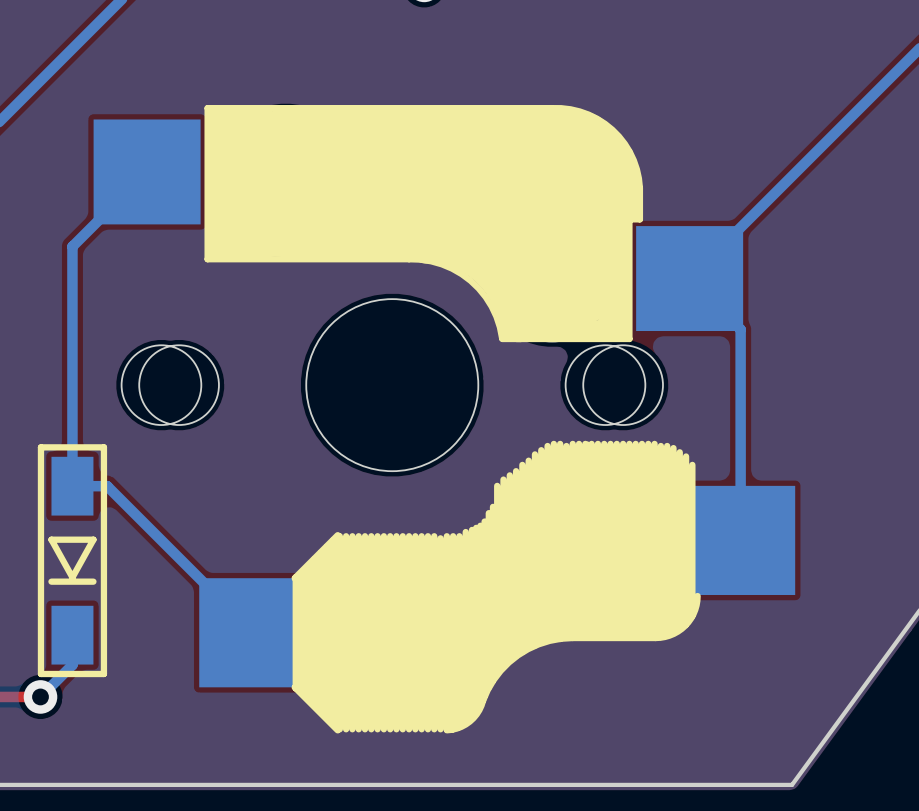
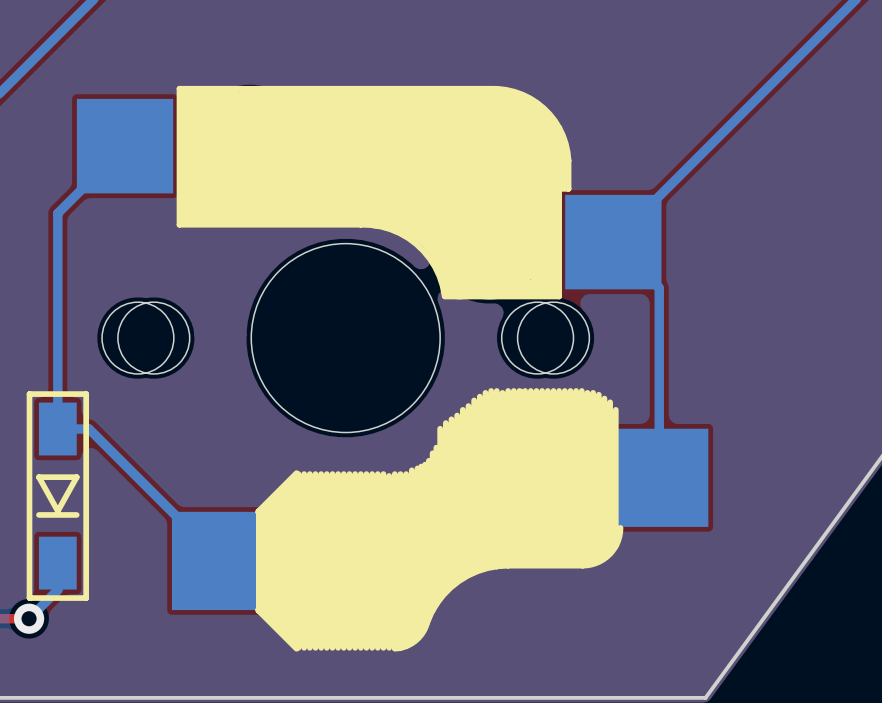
part footprint: [93, 105, 796, 734] -> [76, 85, 709, 652]

